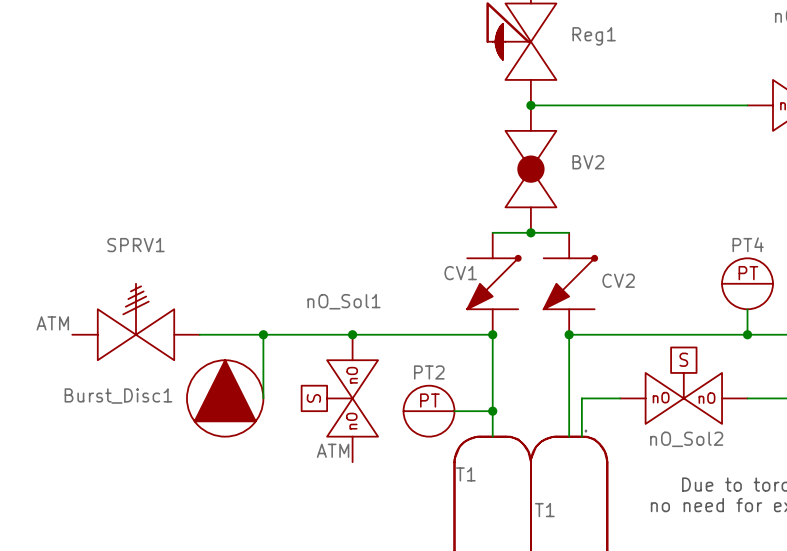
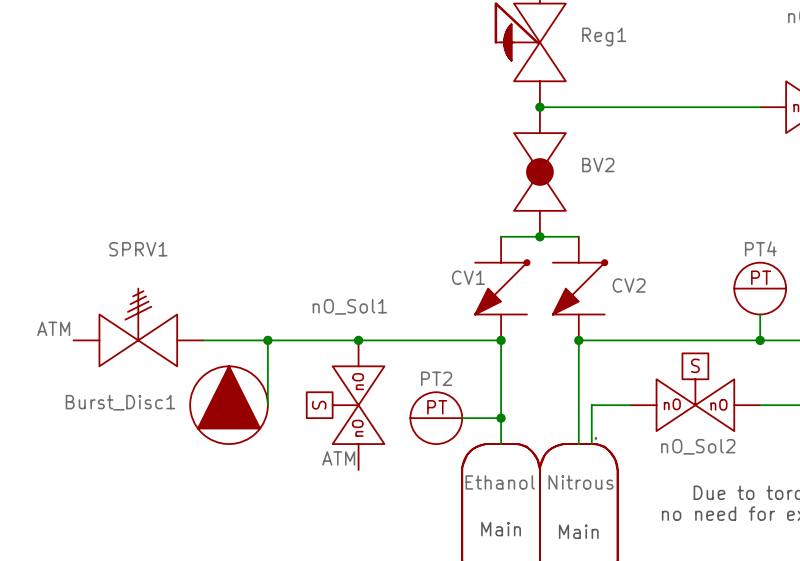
T1 name: T1 (465, 474) -> Ethanol (500, 482)
T1 name: T1 (544, 510) -> Nitrous (581, 482)
text: none -> Main (501, 529)
text: none -> Main (578, 531)

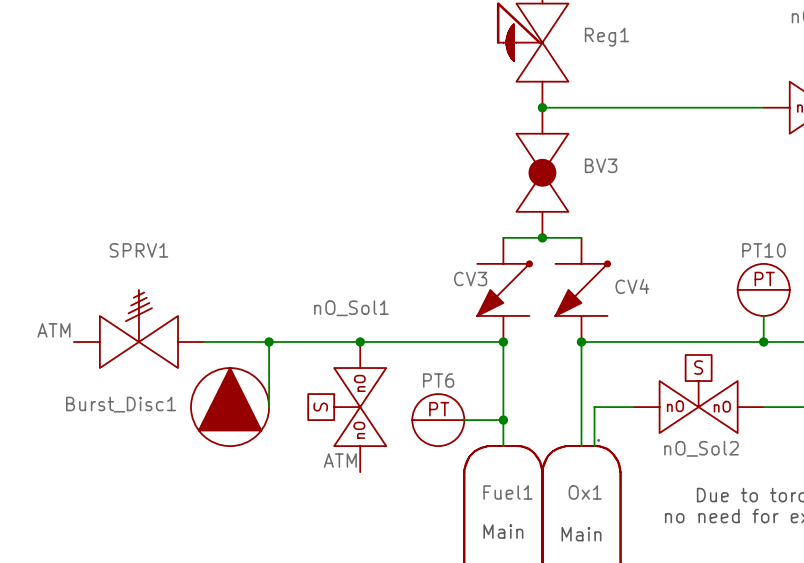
BV2 name: BV2 (598, 165) -> BV3 (601, 165)
PT4 name: PT4 (760, 248) -> PT10 (764, 250)
CV1 name: CV1 (468, 277) -> CV3 (470, 279)
CV2 name: CV2 (629, 285) -> CV4 (632, 286)
PT2 name: PT2 (436, 378) -> PT6 (438, 380)
Ethanol name: Ethanol (500, 482) -> Fuel1 (507, 492)
Nitrous name: Nitrous (581, 482) -> Ox1 (585, 492)

